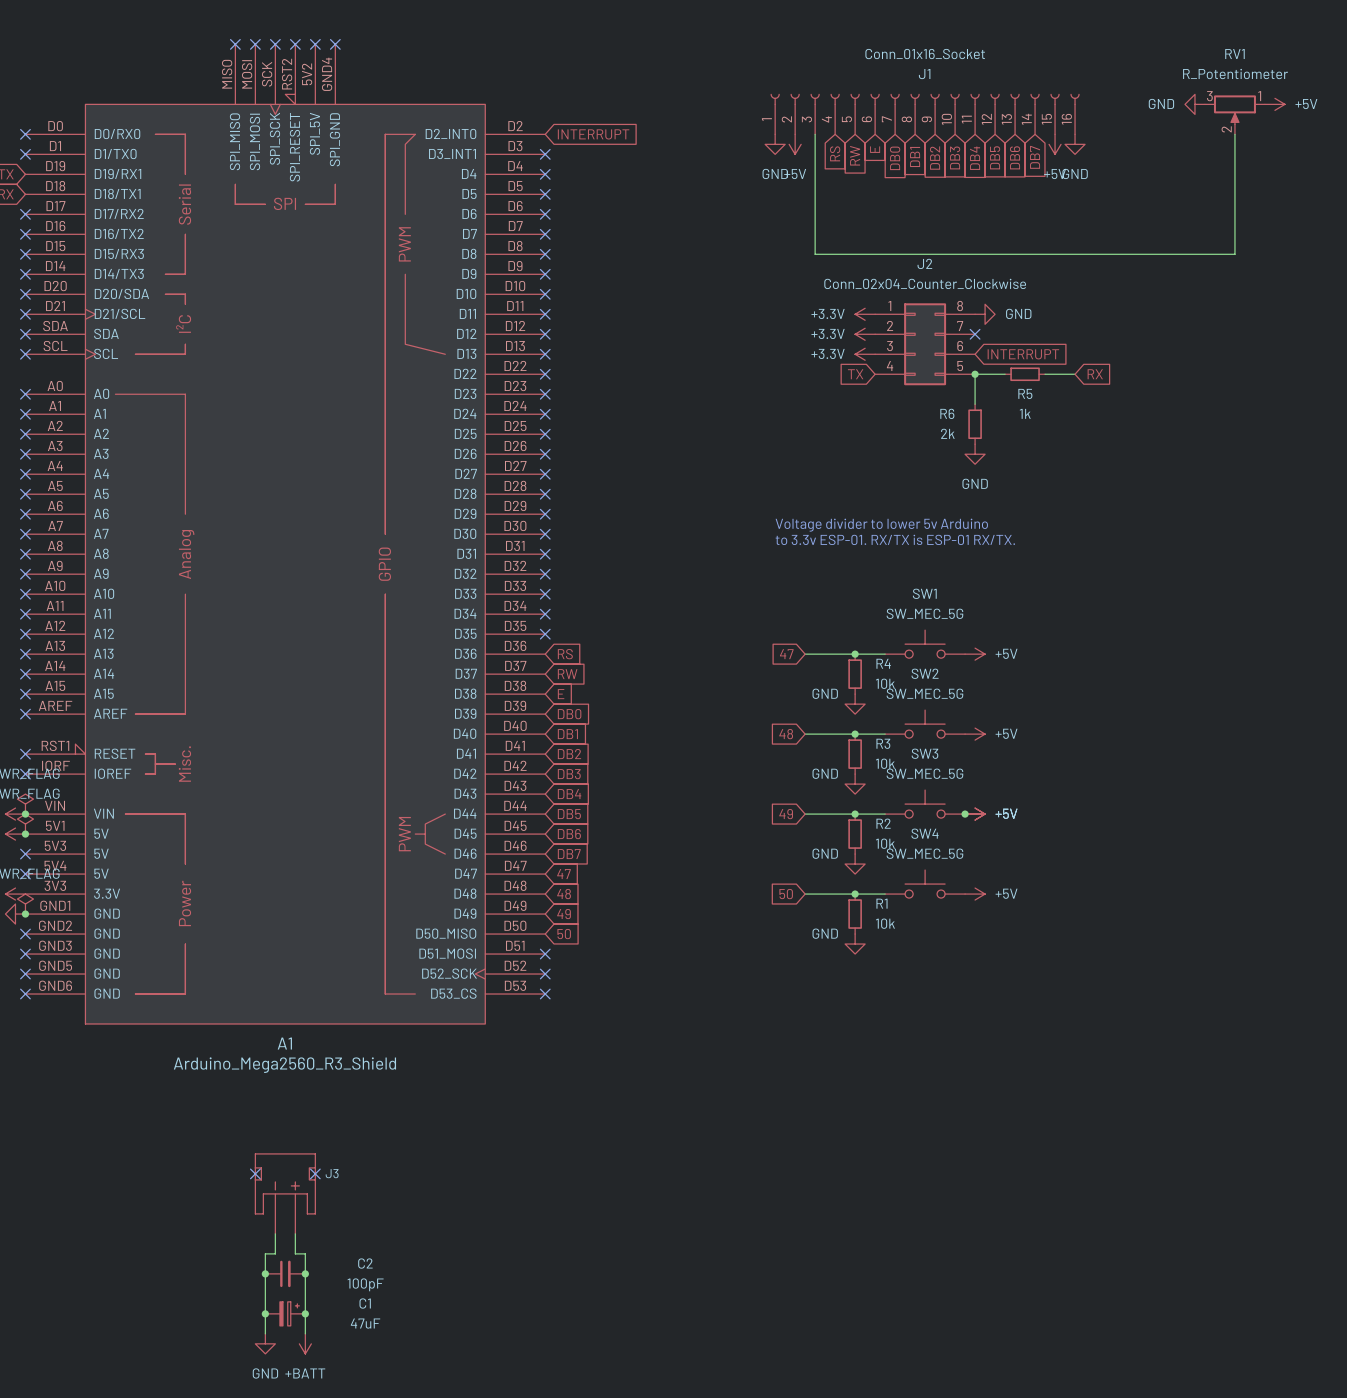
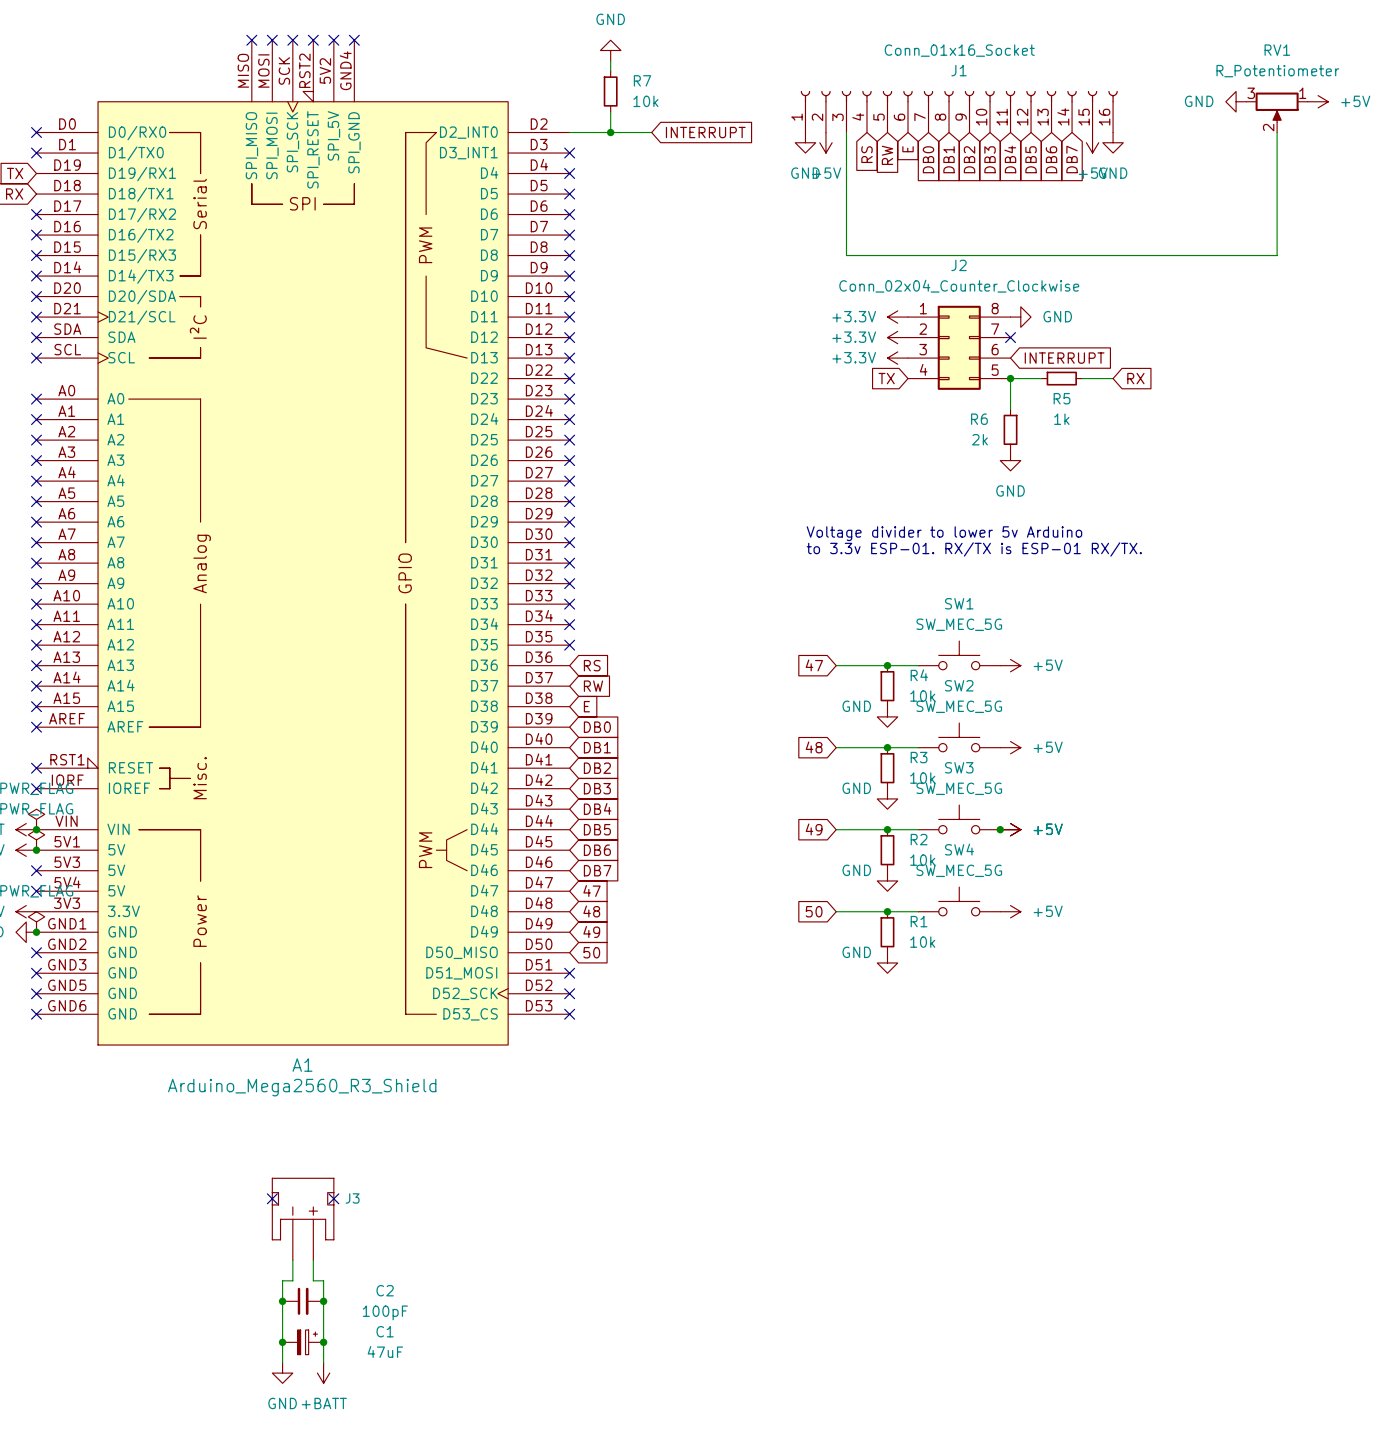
power symbol: none -> GND (610, 50)
wire: none -> (610, 60) (610, 71)
R7: none -> 10k (610, 91)
wire: none -> (610, 112) (610, 132)
wire: none -> (569, 132) (651, 132)
junction: none -> (610, 132)
global label position: INTERRUPT (593, 134) -> INTERRUPT (705, 132)

